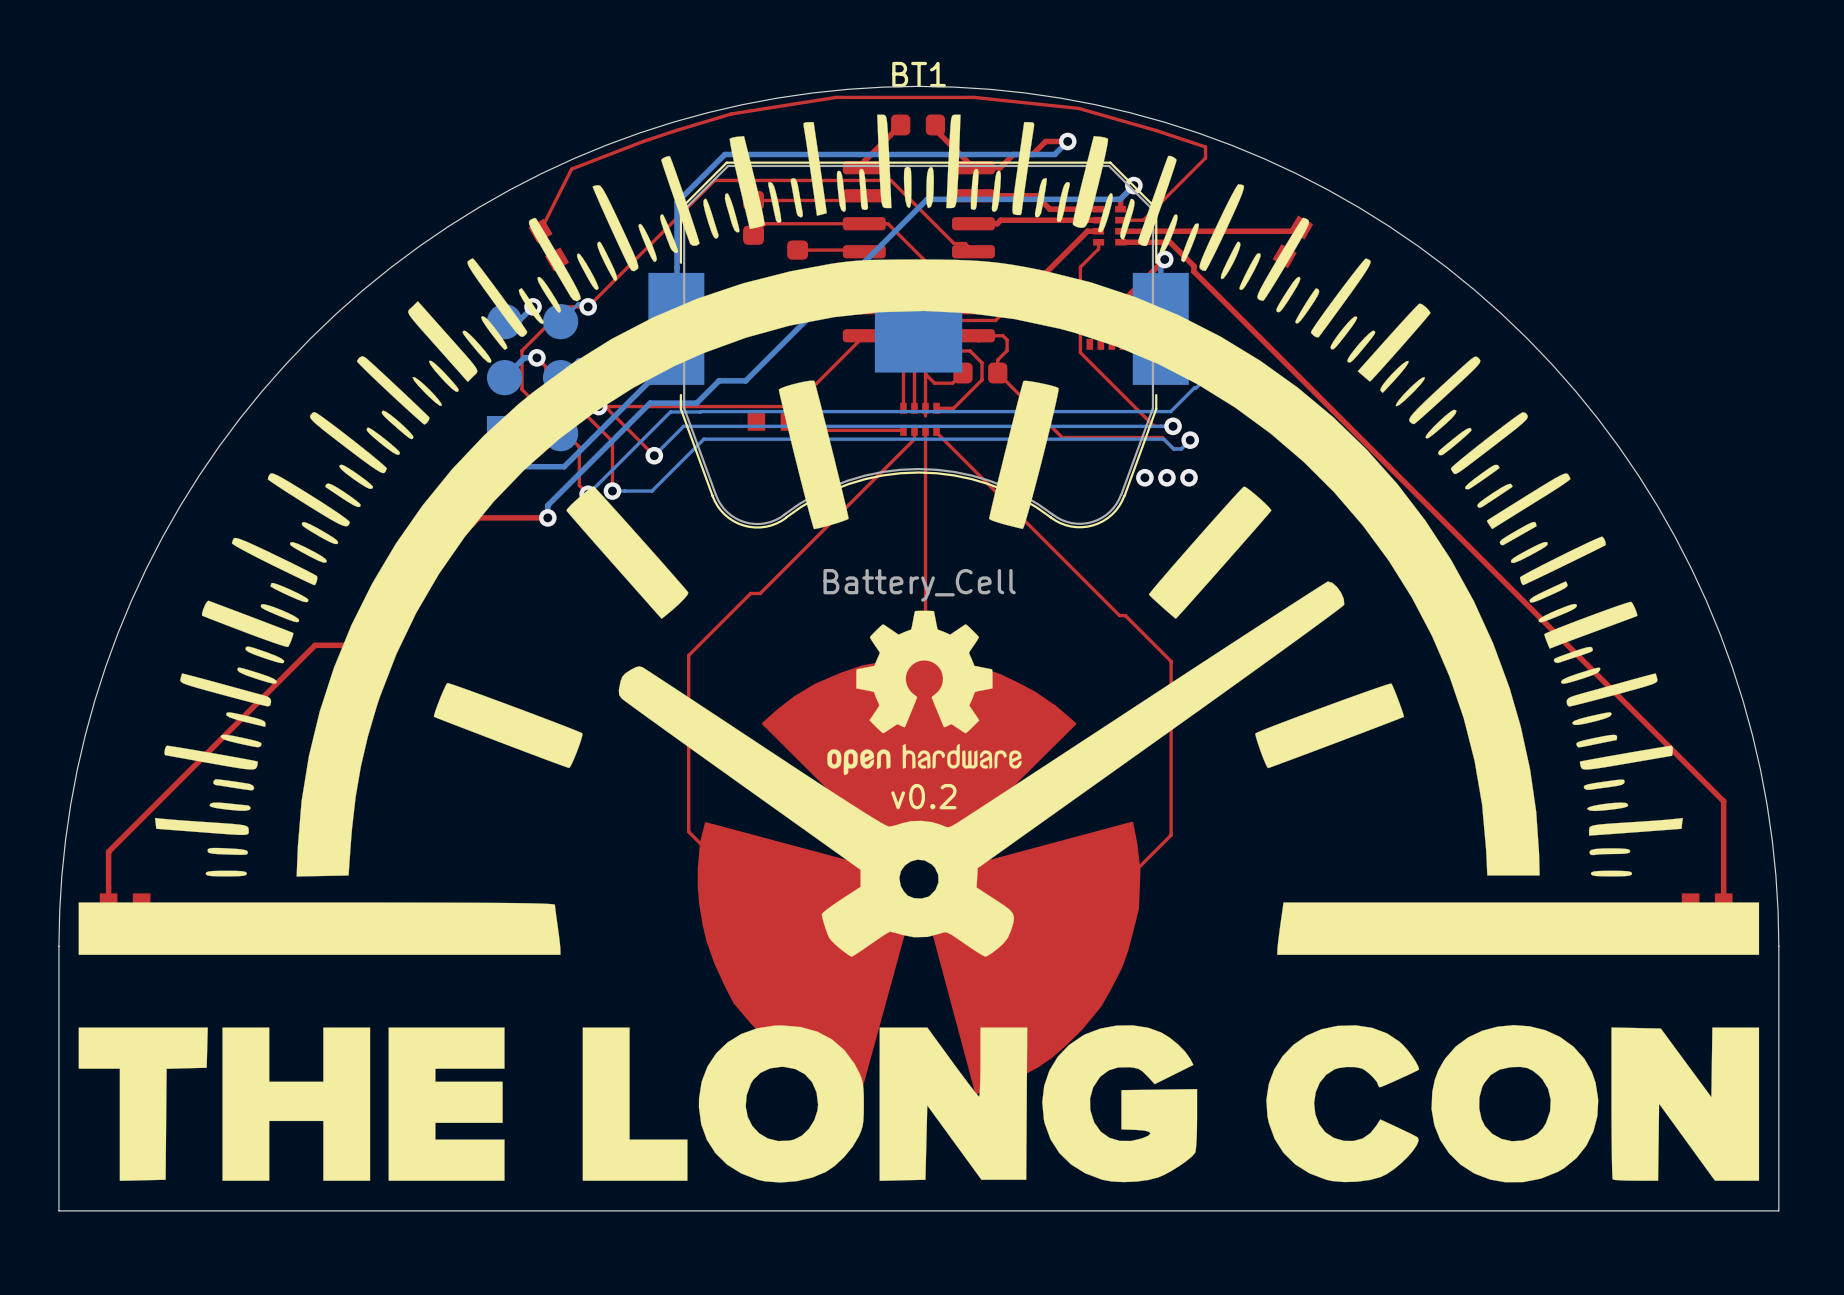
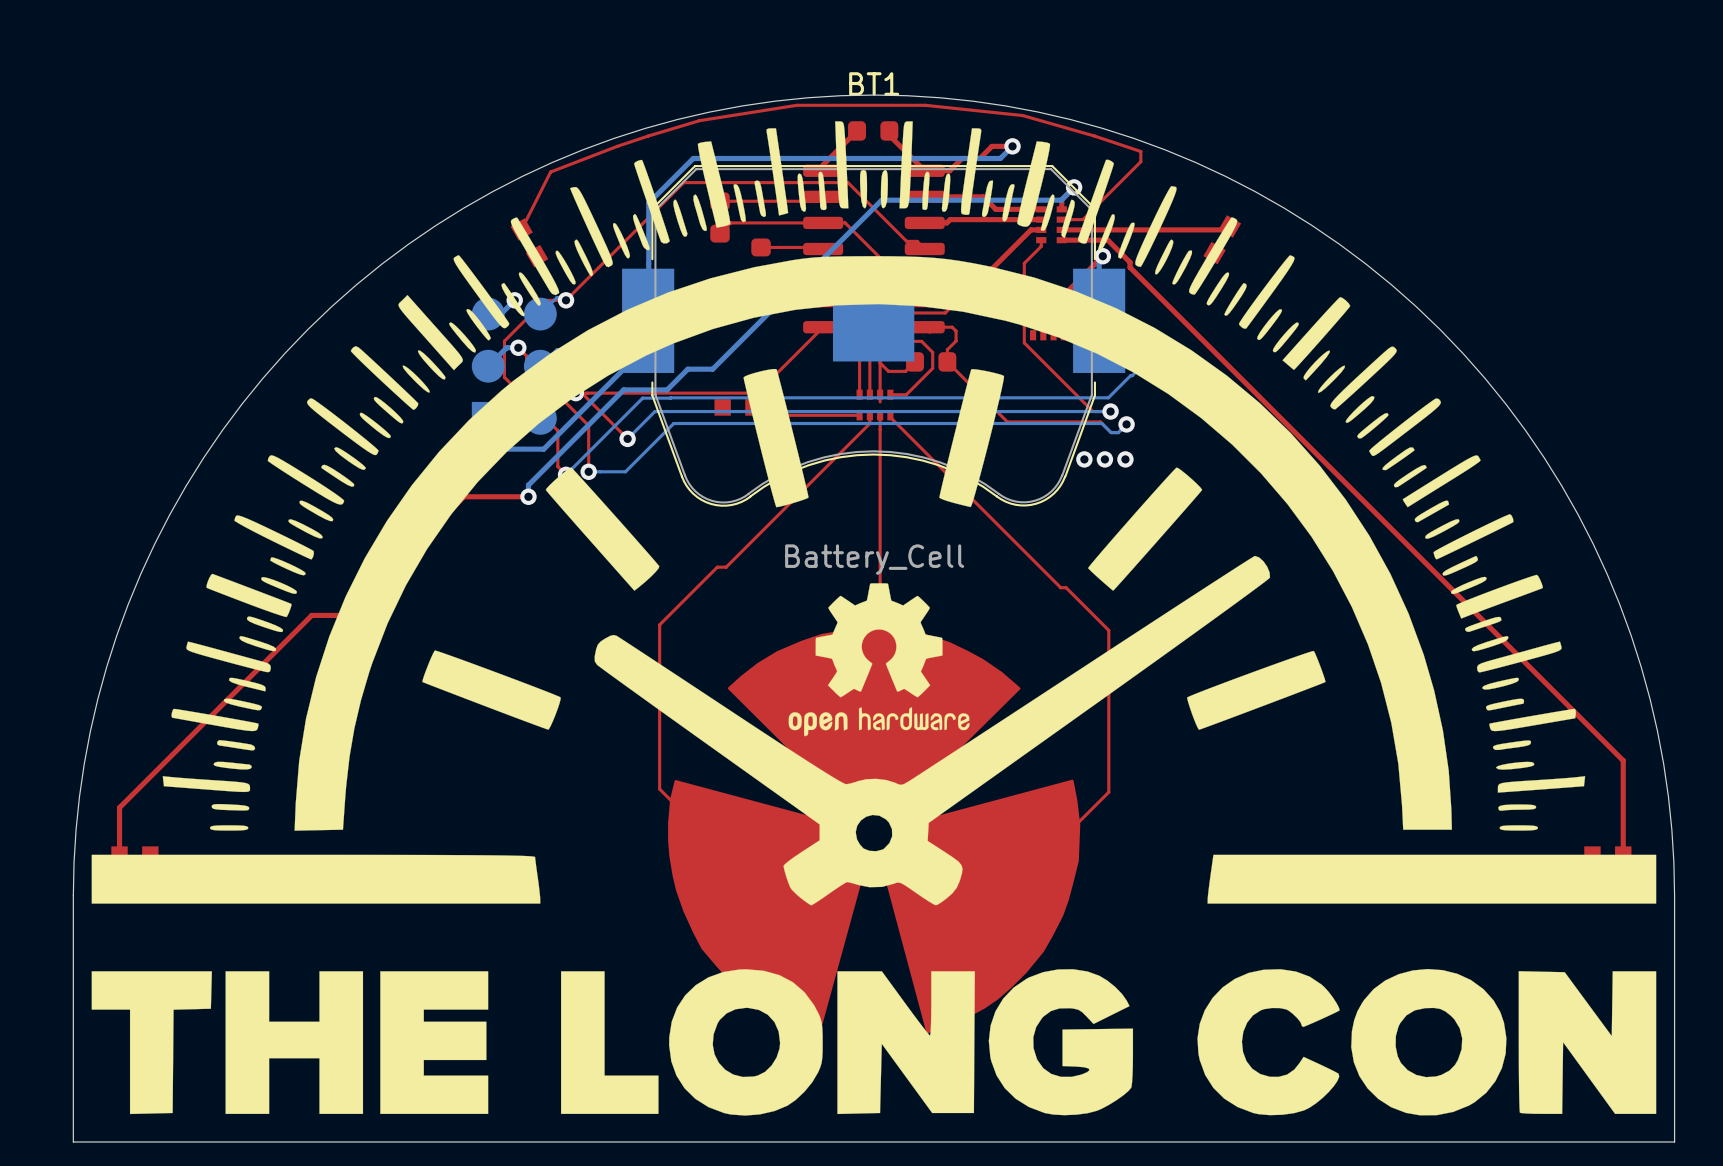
text: v0.2 (923, 796) -> none

